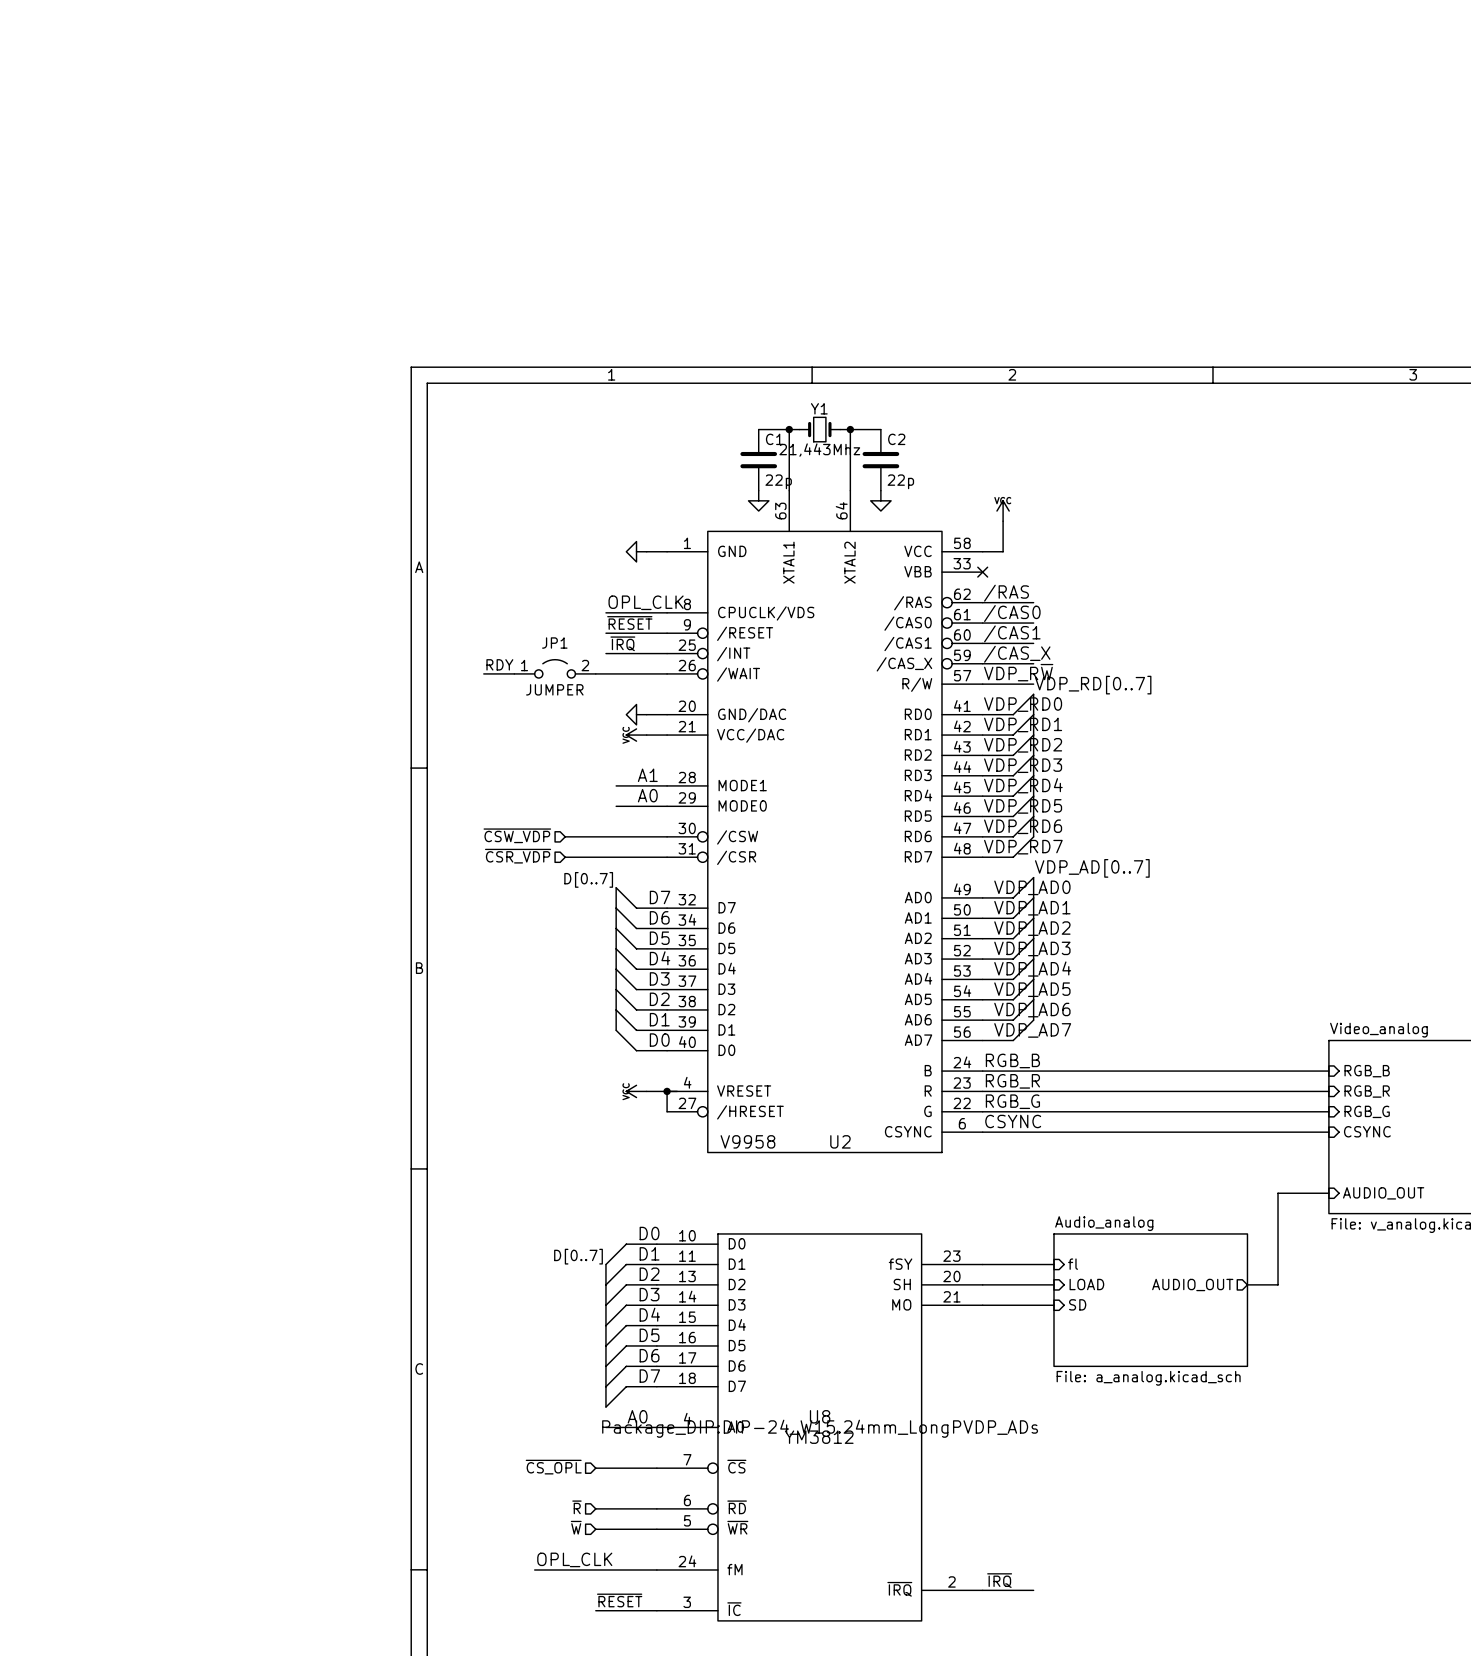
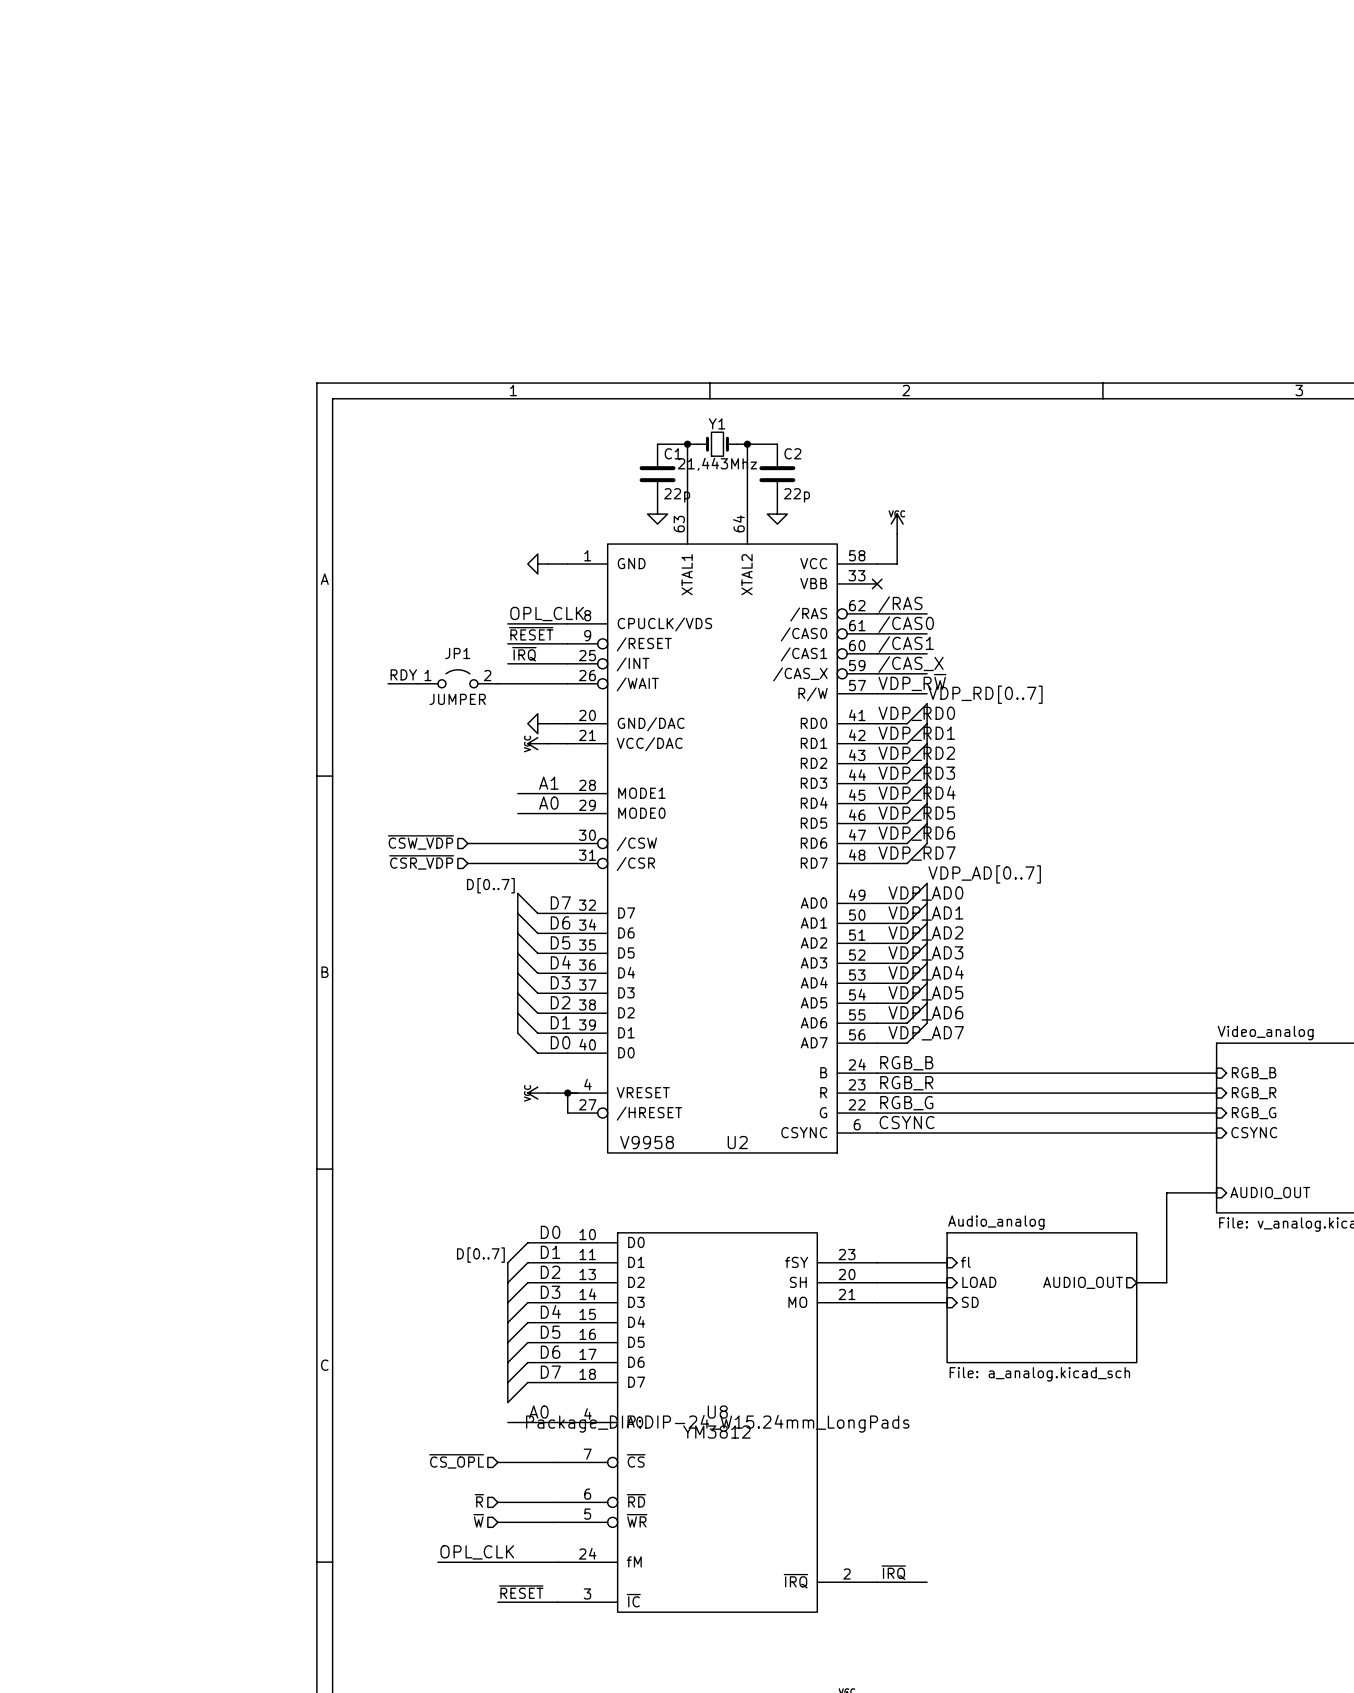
U8 text: Package_DIP:DIP-24_W15.24mm_LongPVDP_ADs (820, 1428) -> Package_DIP:DIP-24_W15.24mm_LongPads (717, 1423)

